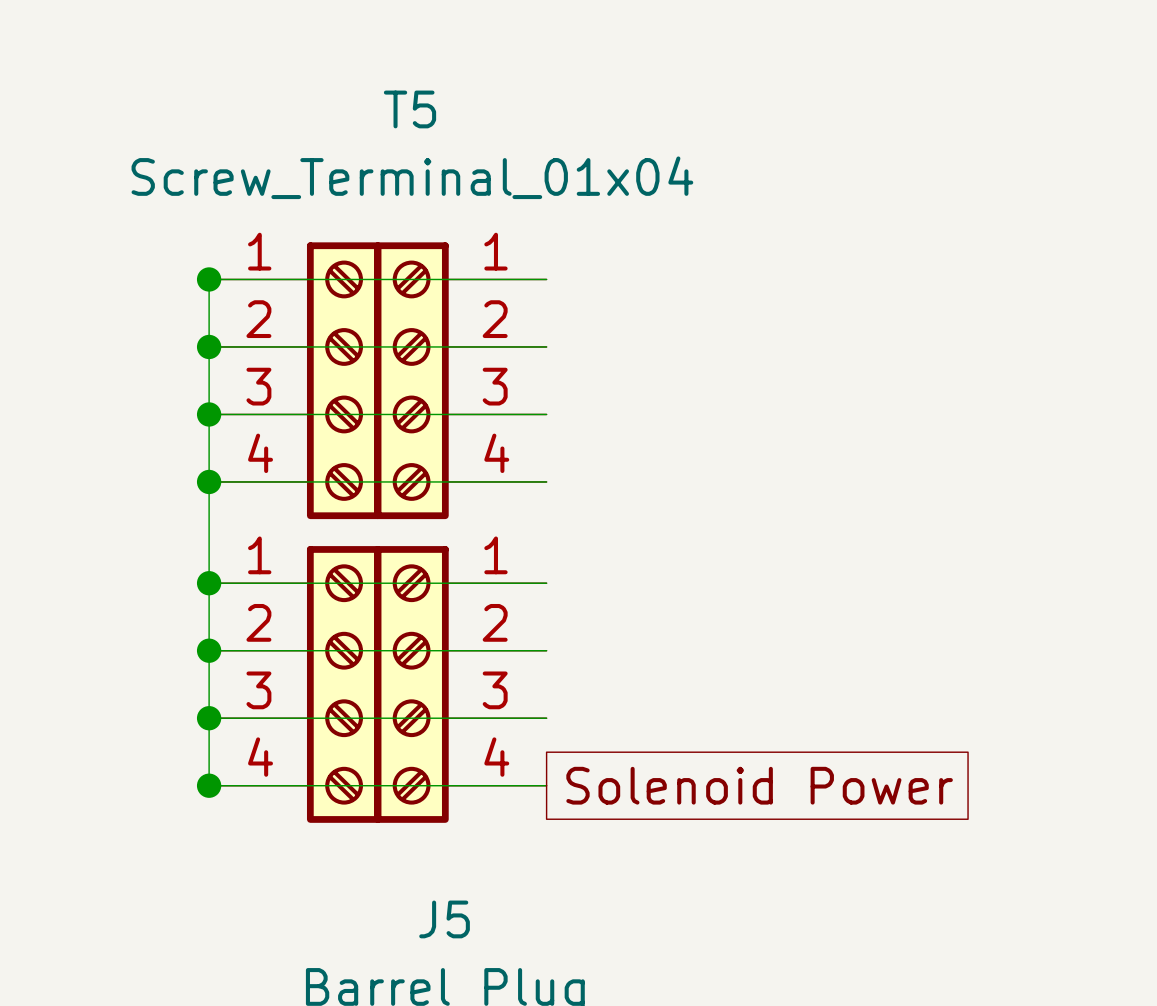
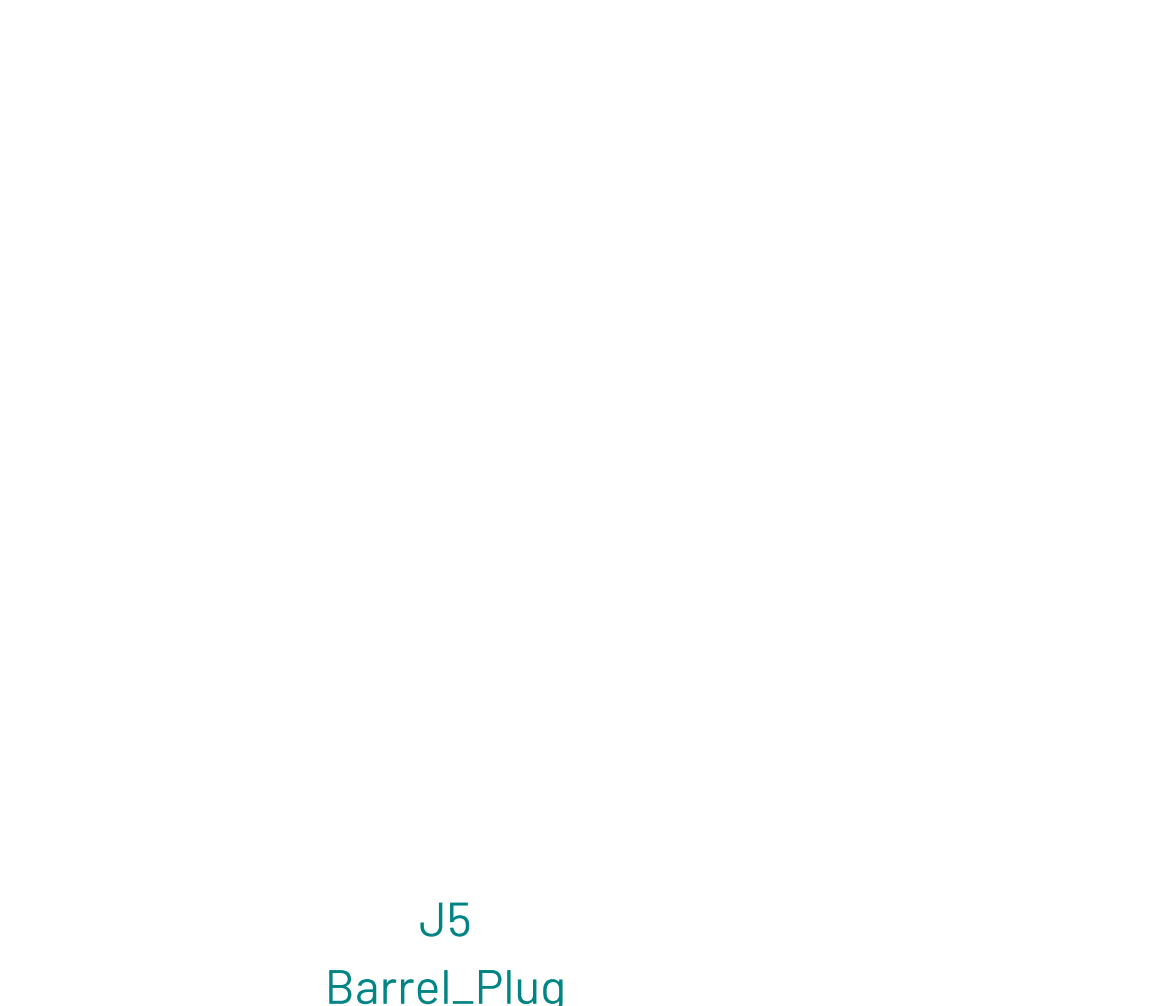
junction: (209, 279) -> none
wire: (546, 279) (209, 279) (209, 785) (546, 785) -> none
wire: (209, 346) (546, 346) -> none
junction: (209, 346) -> none
part: (295, 380) -> none
T5: Screw_Terminal_01x04 (460, 380) -> none
wire: (209, 414) (546, 414) -> none
junction: (209, 414) -> none
wire: (209, 481) (546, 481) -> none
junction: (209, 481) -> none
wire: (209, 583) (546, 583) -> none
junction: (209, 583) -> none
wire: (209, 650) (546, 650) -> none
junction: (209, 650) -> none
part: (295, 684) -> none
part: (460, 684) -> none
wire: (209, 718) (546, 718) -> none
junction: (209, 718) -> none
junction: (209, 785) -> none
global label: Solenoid Power (759, 785) -> none

